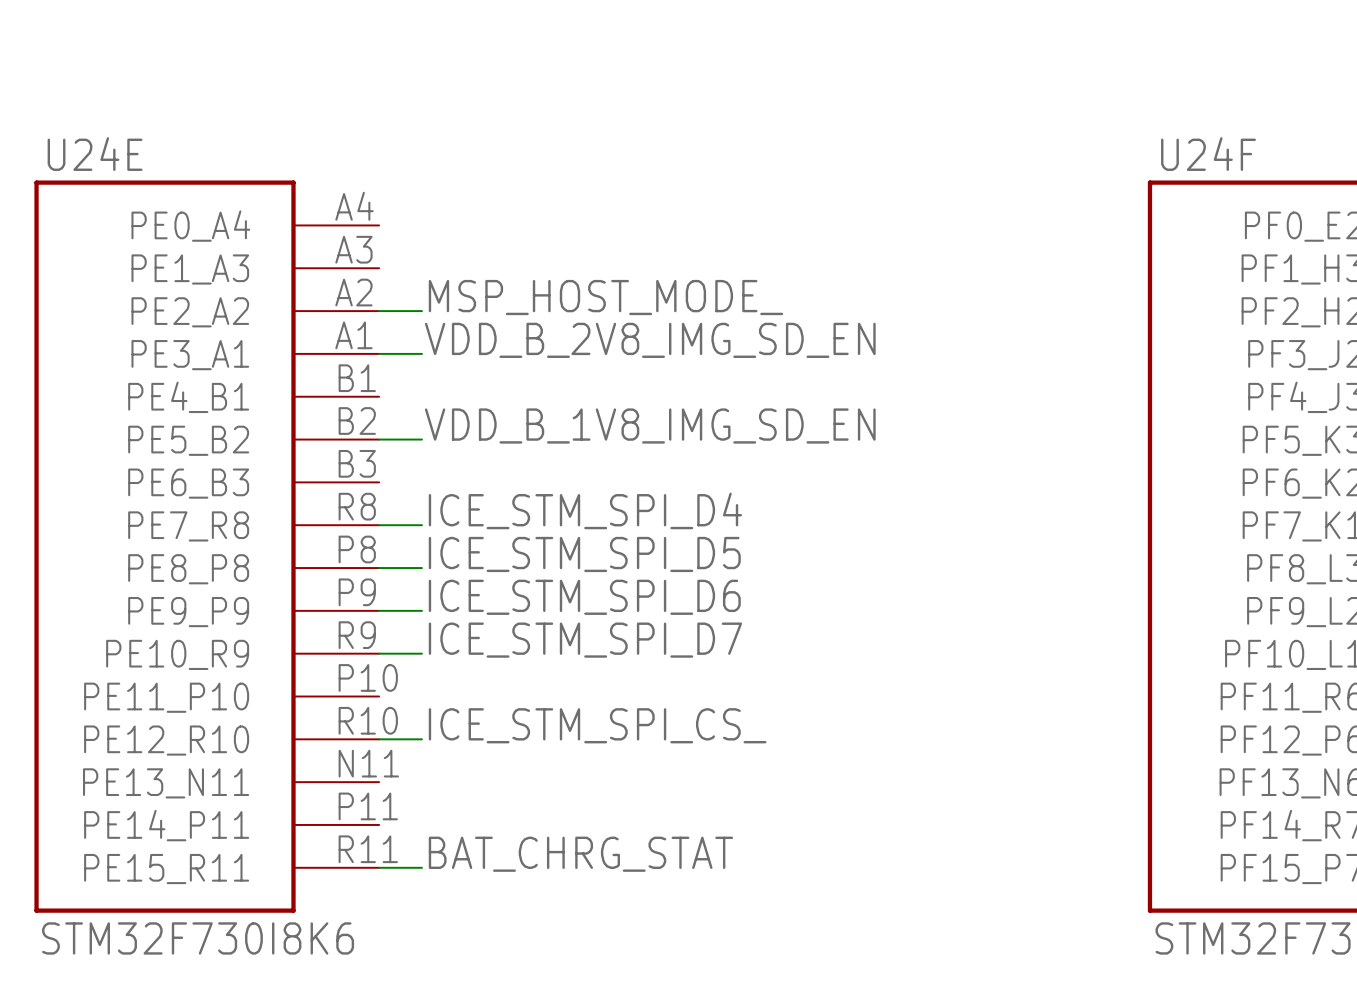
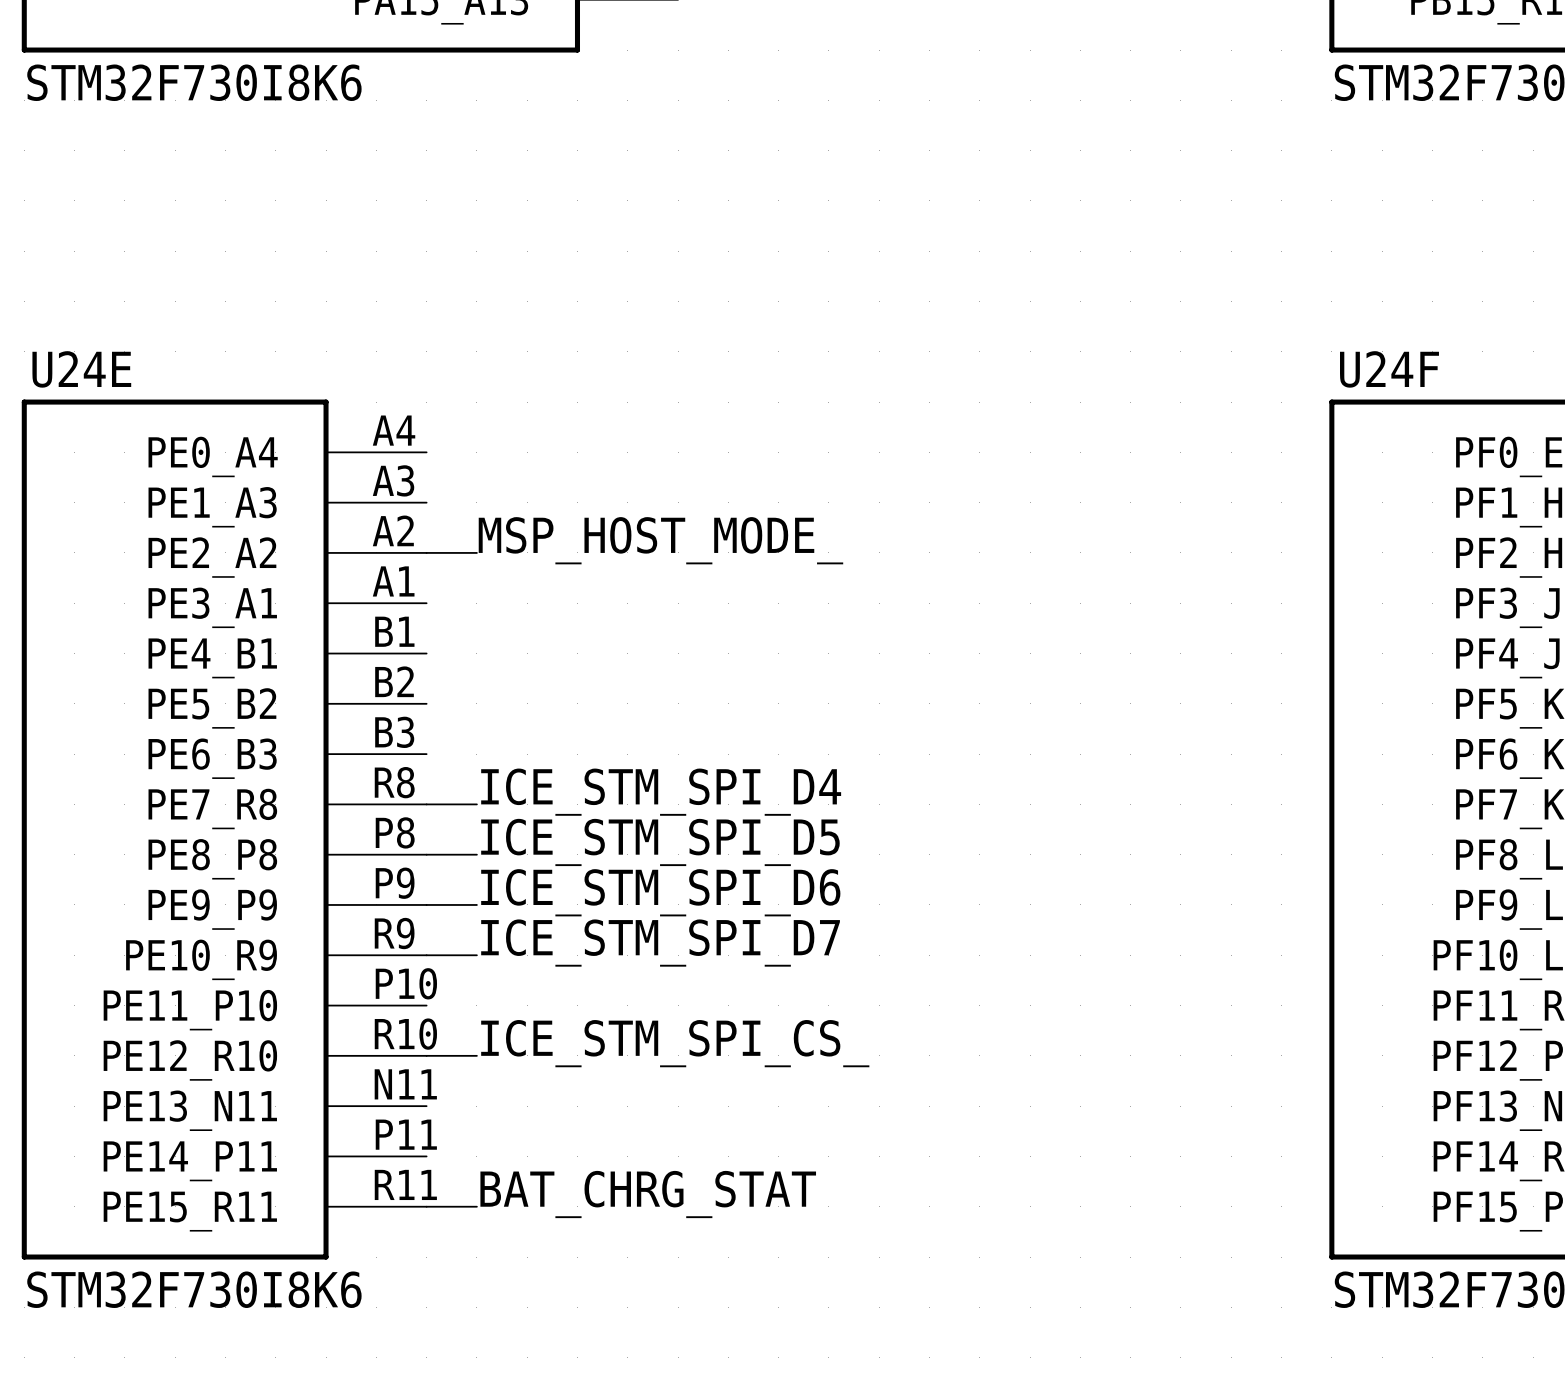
label: VDD_B_2V8_IMG_SD_EN (650, 340) -> none
wire: (379, 353) (421, 353) -> none
label: VDD_B_1V8_IMG_SD_EN (650, 425) -> none
wire: (379, 439) (421, 439) -> none

